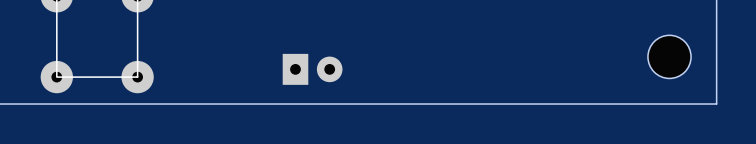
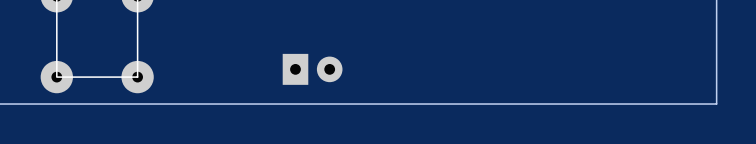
part: (669, 56) -> none

